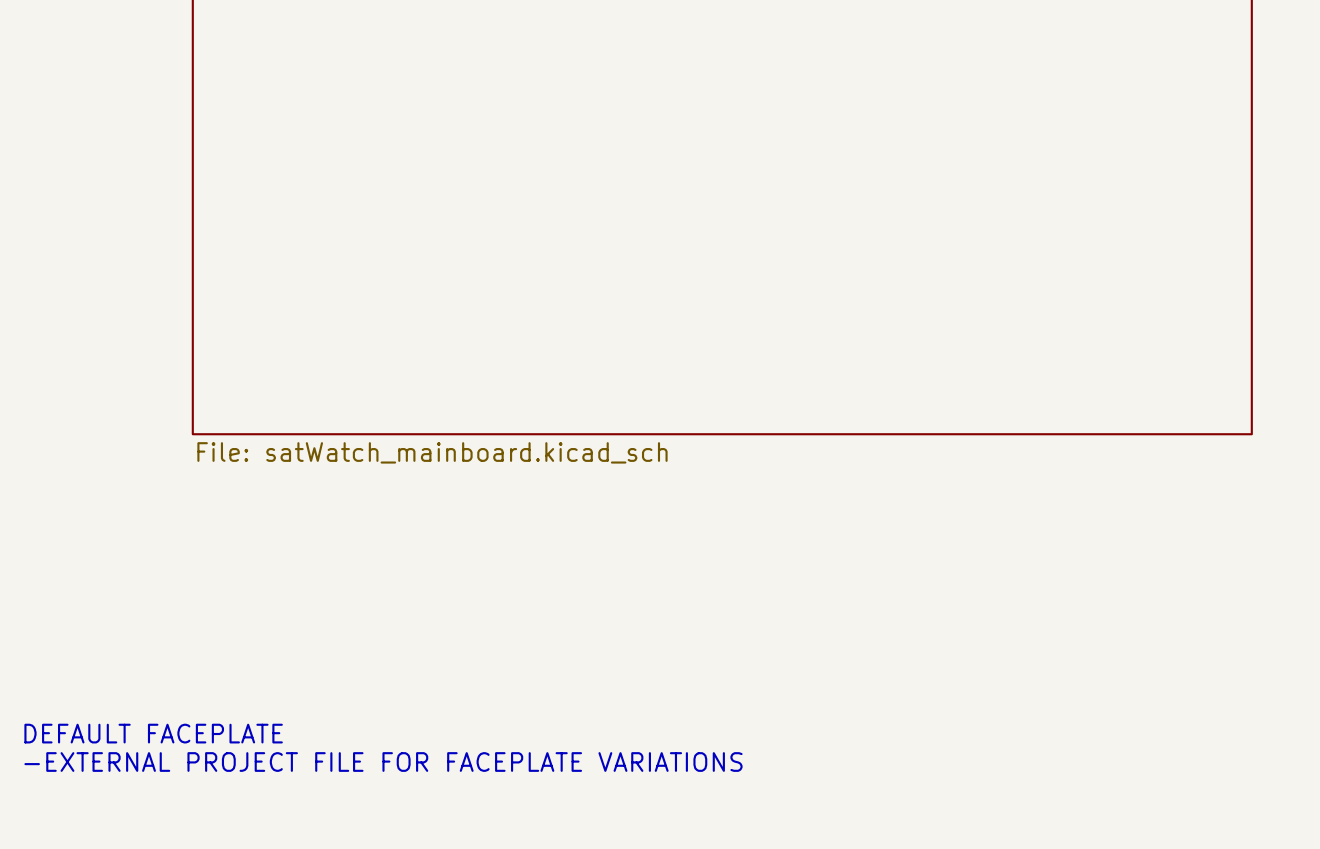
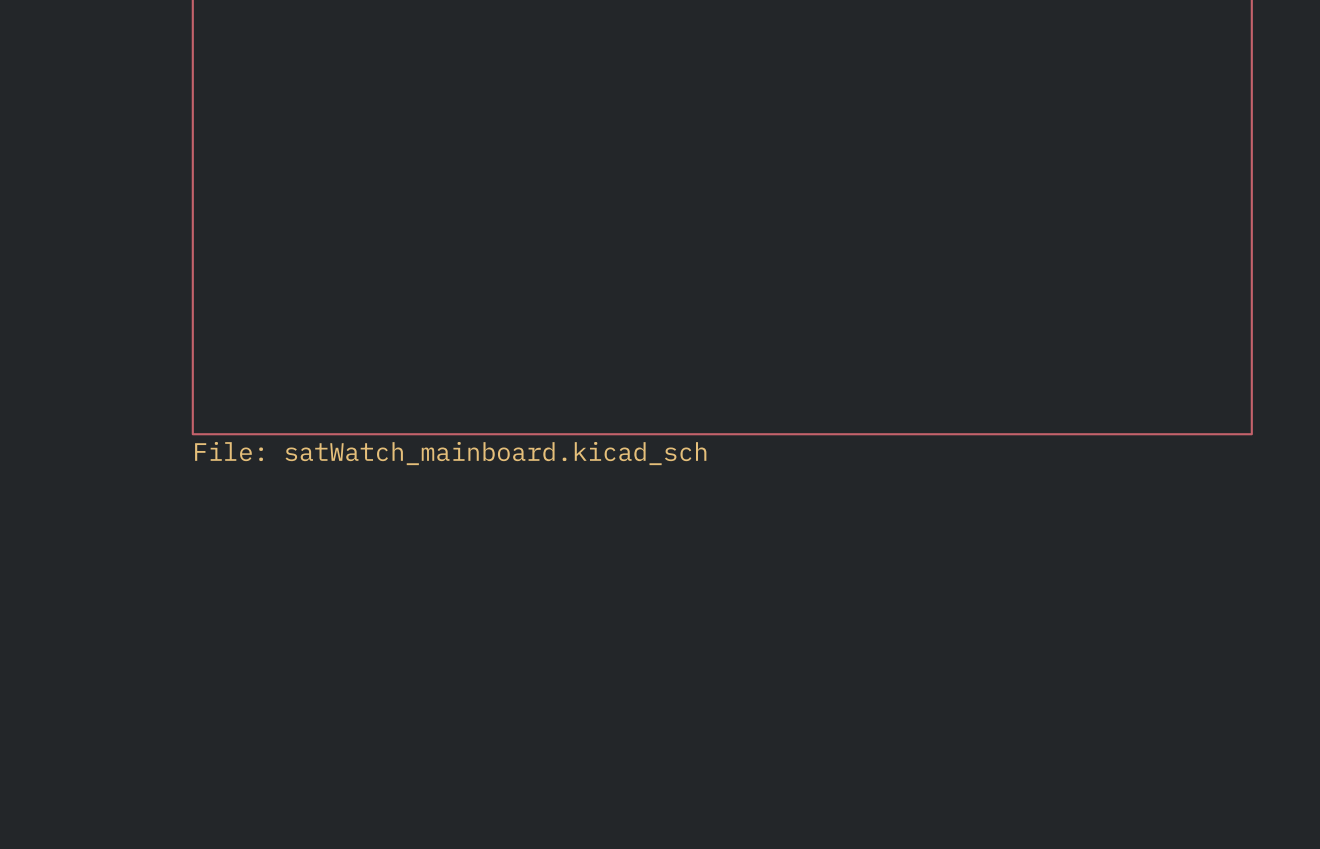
text: DEFAULT FACEPLATE (153, 733) -> none
text: -EXTERNAL PROJECT FILE FOR FACEPLATE VARIATIONS (383, 762) -> none

